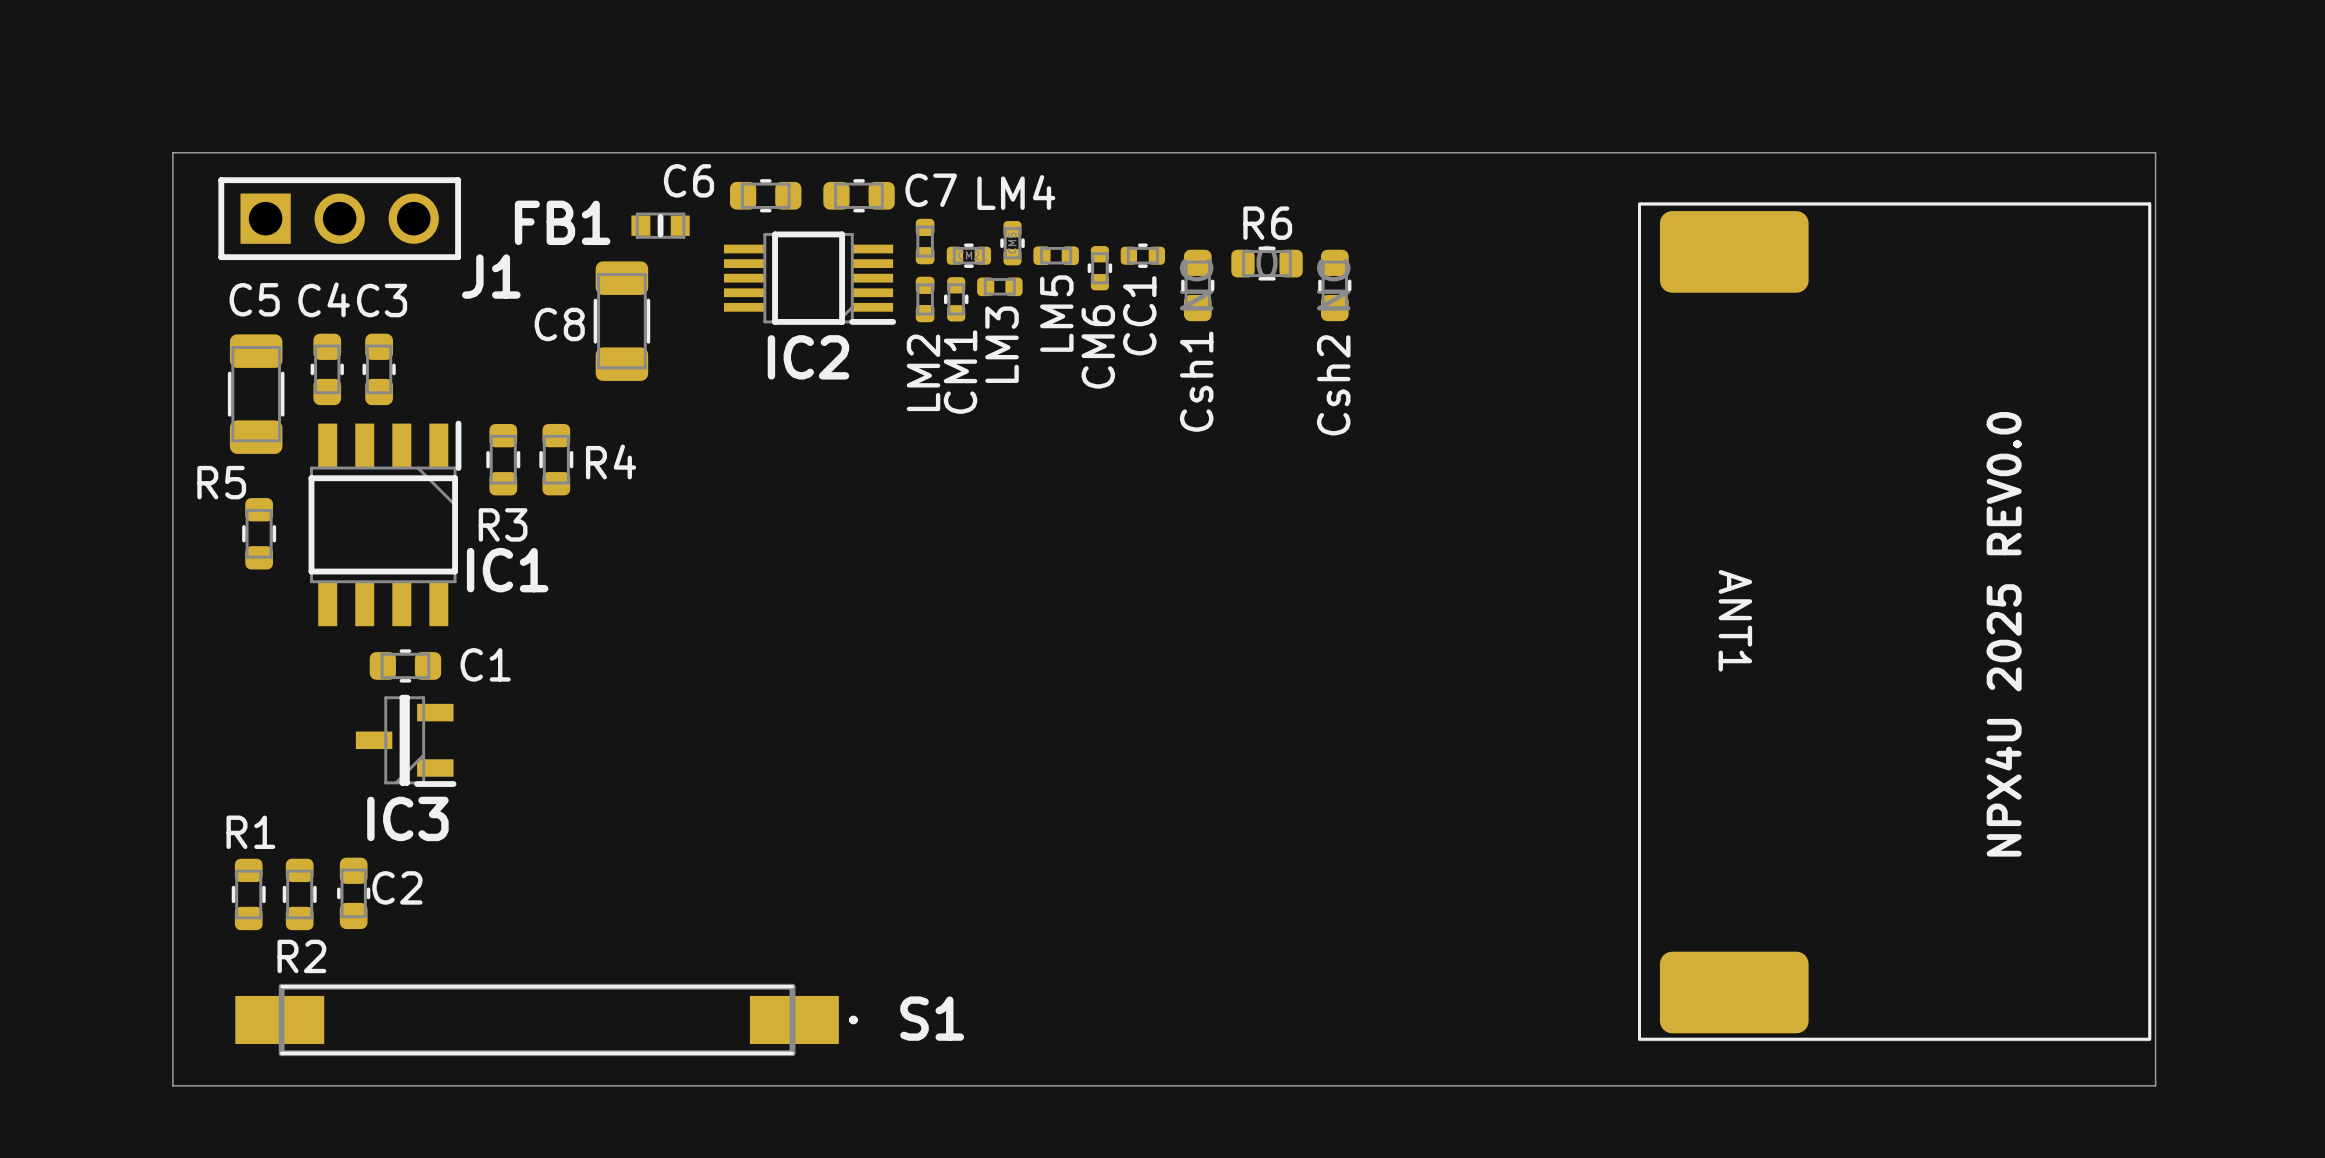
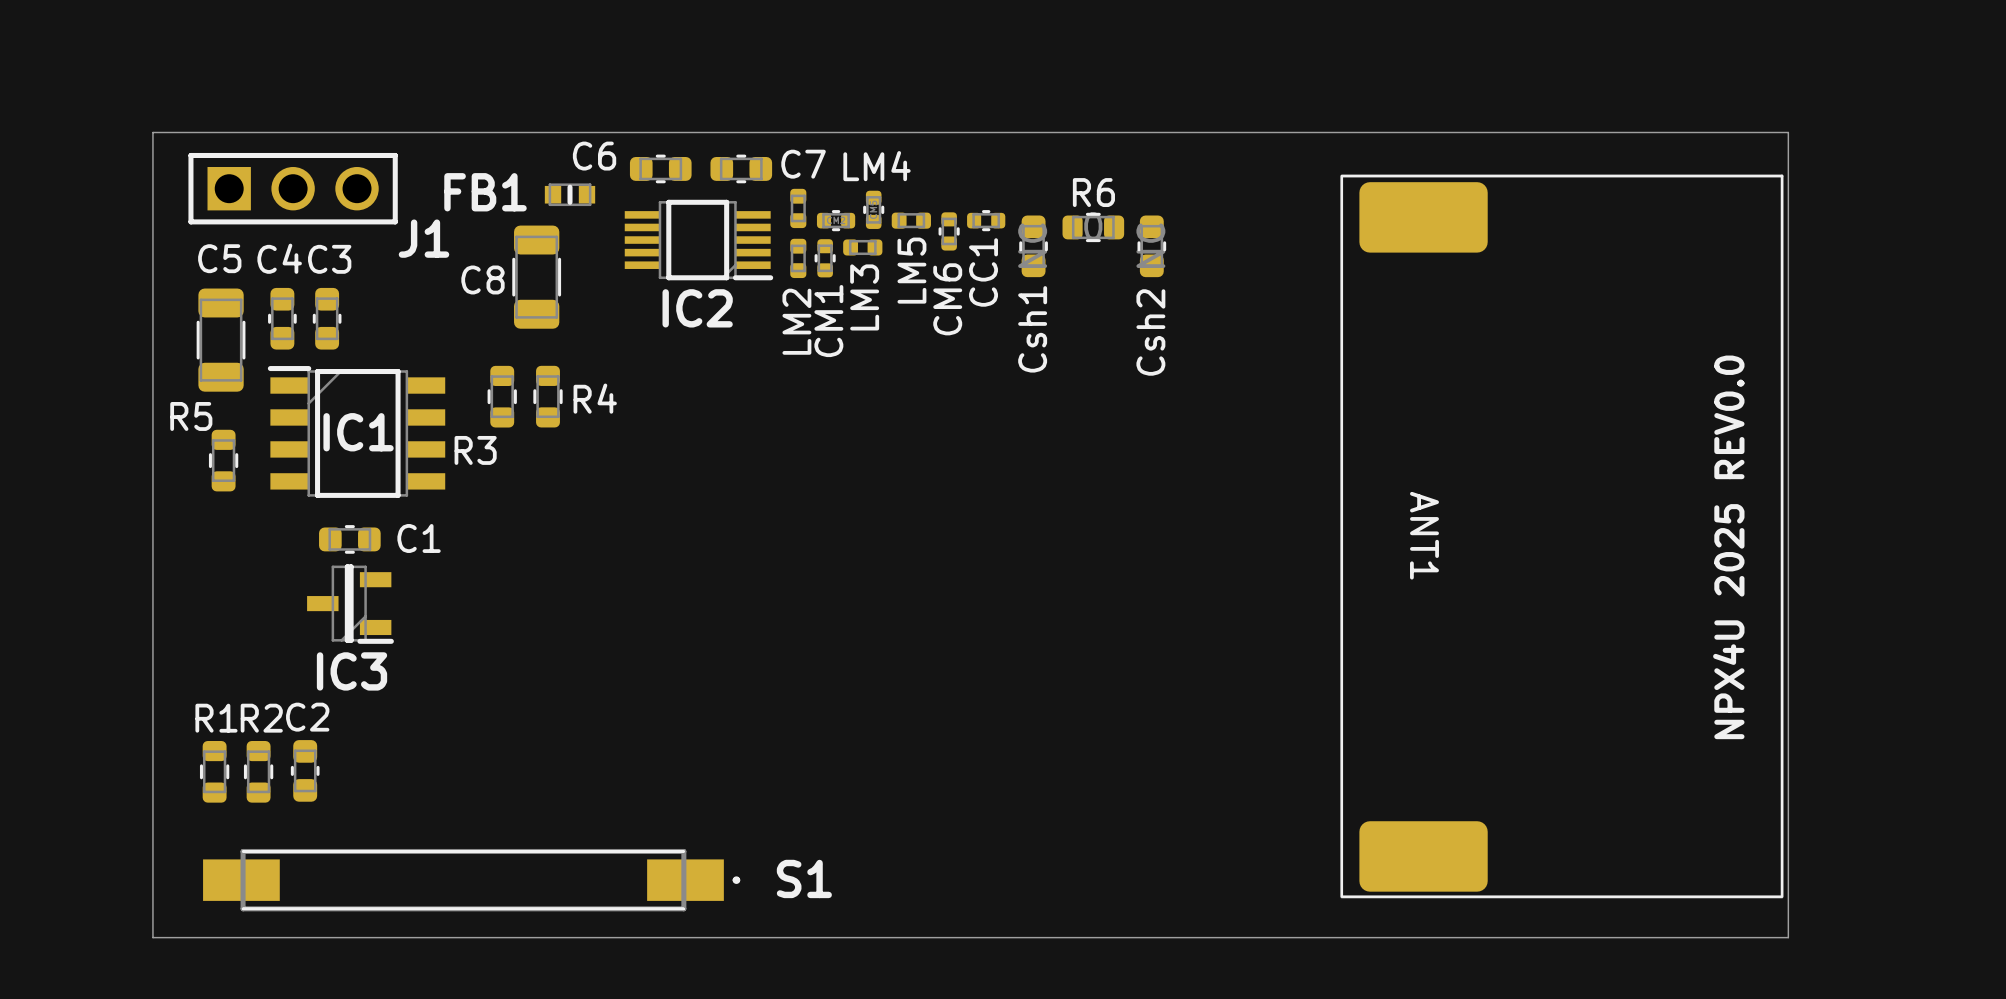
board edge: (172, 152) (2155, 152) (2155, 1085) (172, 1085) (172, 152) -> (152, 132) (152, 937) (1788, 937) (1788, 132) (152, 132)
R3 position: (503, 459) -> (502, 396)
R4 position: (556, 459) -> (547, 396)
IC1 rotation: 0° (385, 523) -> 90° counterclockwise (356, 431)
R3 name position: R3 (503, 524) -> R3 (475, 450)
IC1 name position: IC1 (507, 570) -> IC1 (358, 432)
ANT1 position: (1894, 621) -> (1561, 536)
C1 position: (405, 665) -> (349, 539)
IC3 position: (406, 740) -> (350, 604)
C2 name position: C2 (397, 887) -> C2 (307, 717)
R2 name position: R2 (301, 956) -> R2 (261, 718)

